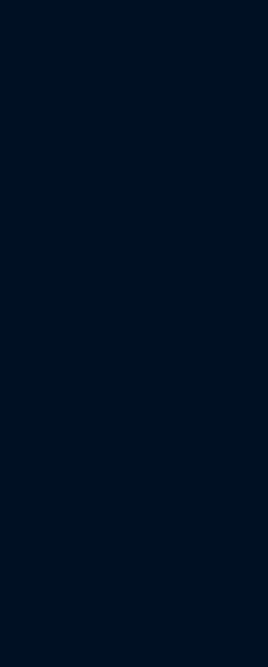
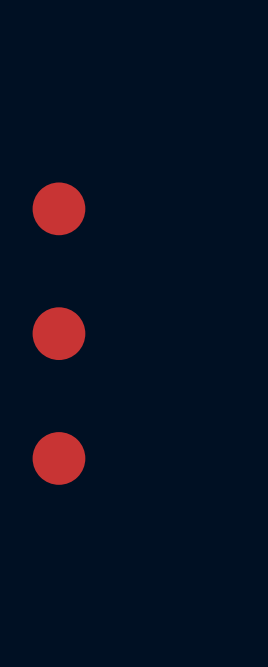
part: none -> (58, 208)
part: none -> (58, 333)
part: none -> (58, 458)

